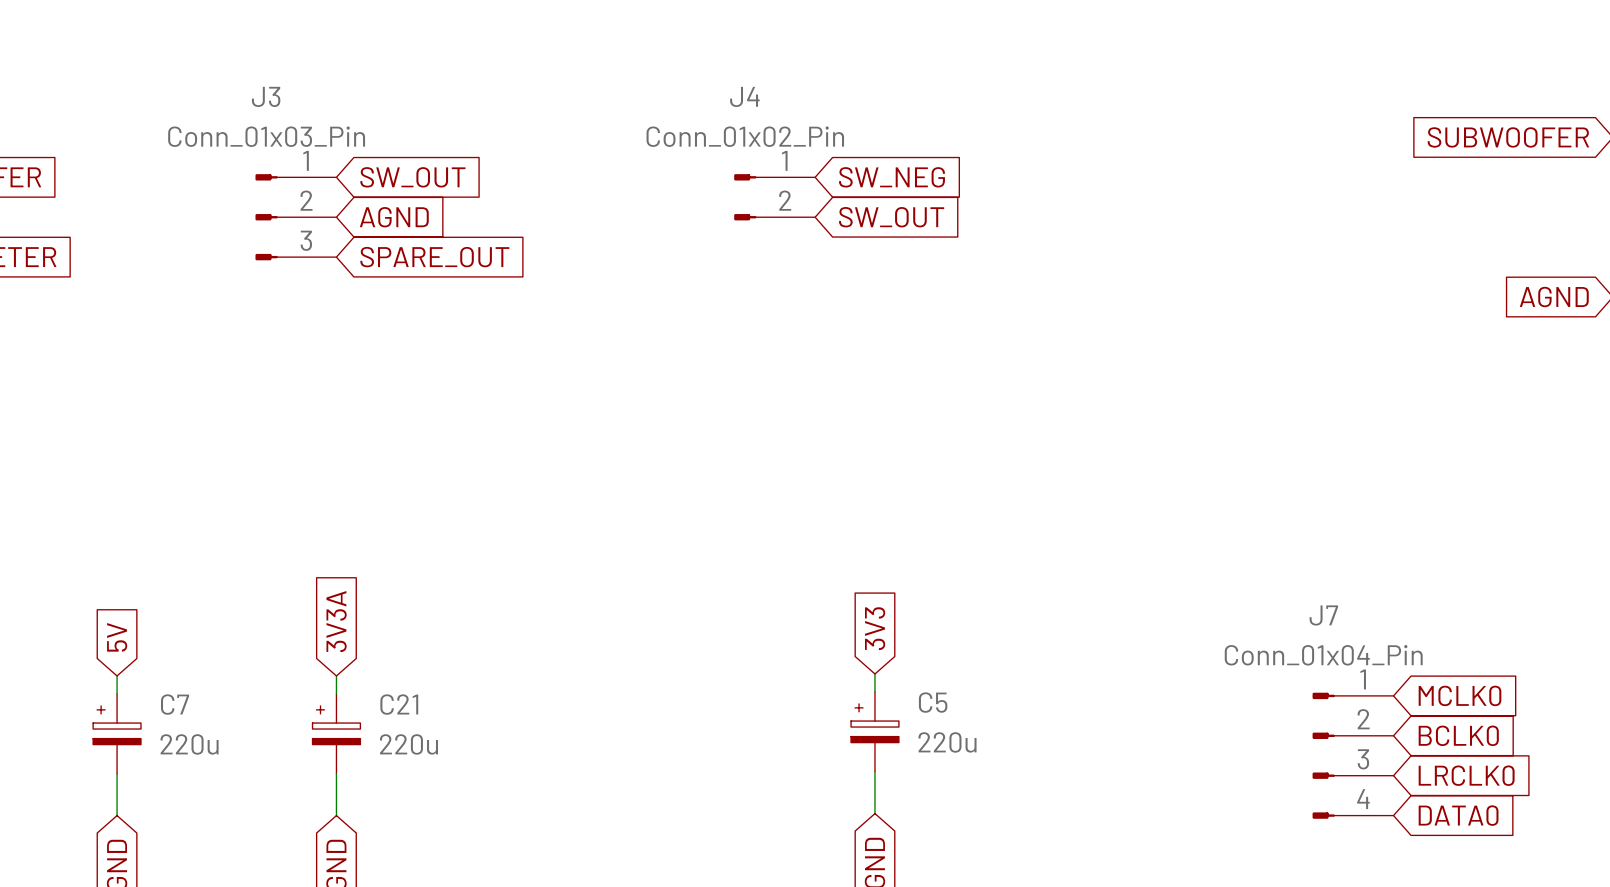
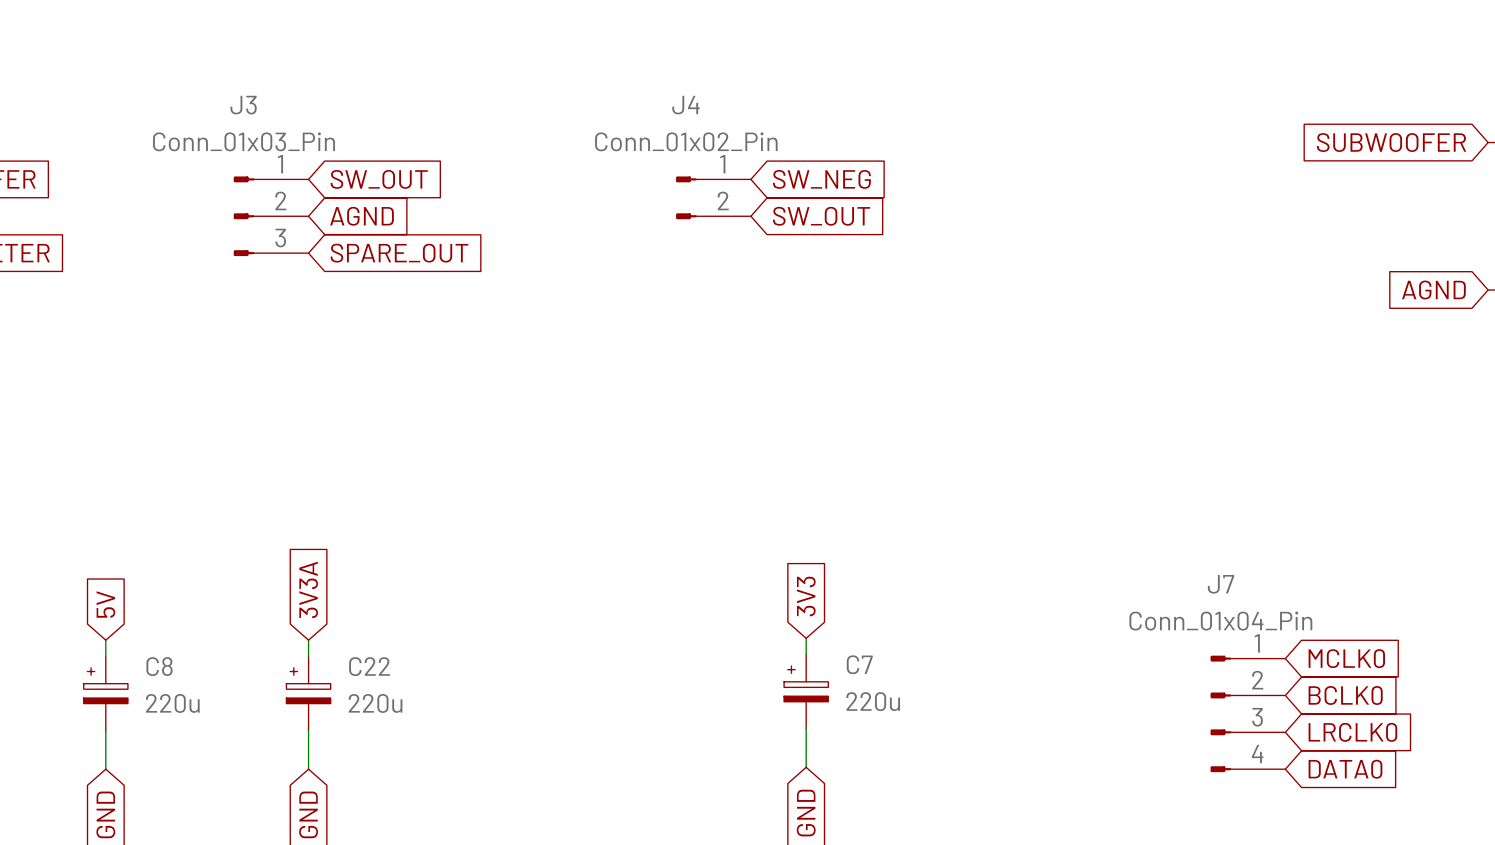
C5 name: C5 (933, 702) -> C7 (859, 664)
C7 name: C7 (175, 704) -> C8 (159, 666)
C21 name: C21 (399, 704) -> C22 (369, 666)

